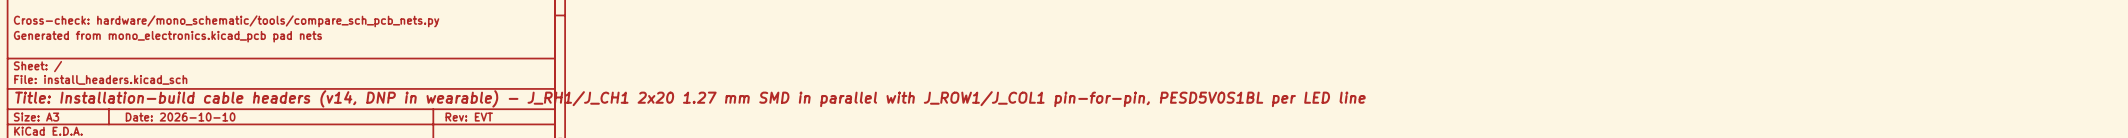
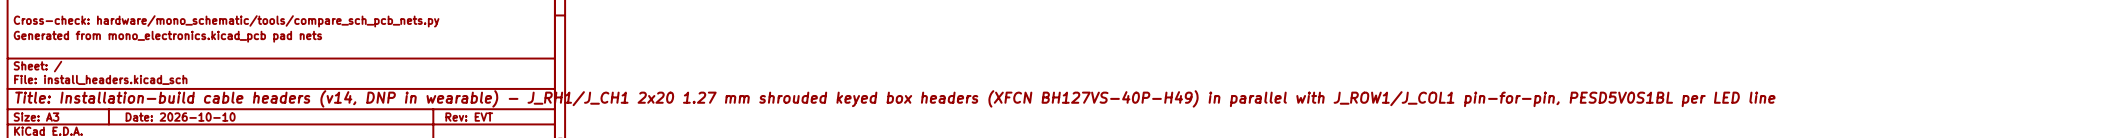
title block: Title: Installation-build cable headers (v14, DNP in wearable) - J_RH1/J_CH1 2x20 1.27 mm SMD in parallel with J_ROW1/J_COL1 pin-for-pin, PESD5V0S1BL per LED line (690, 98) -> Title: Installation-build cable headers (v14, DNP in wearable) - J_RH1/J_CH1 2x20 1.27 mm shrouded keyed box headers (XFCN BH127VS-40P-H49) in parallel with J_ROW1/J_COL1 pin-for-pin, PESD5V0S1BL per LED line (895, 98)

